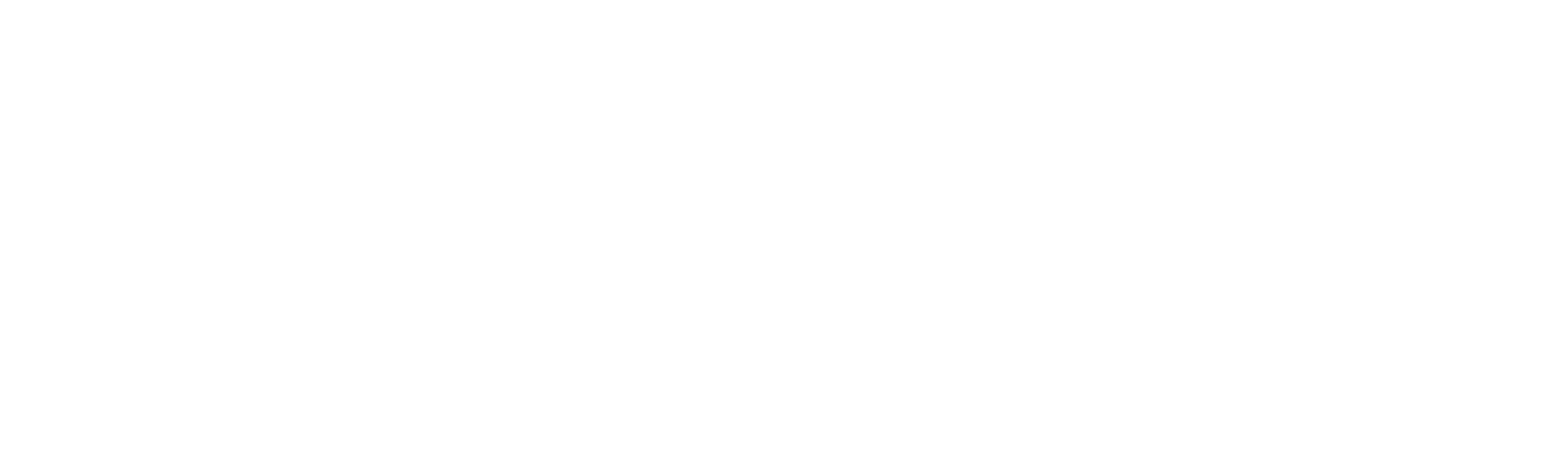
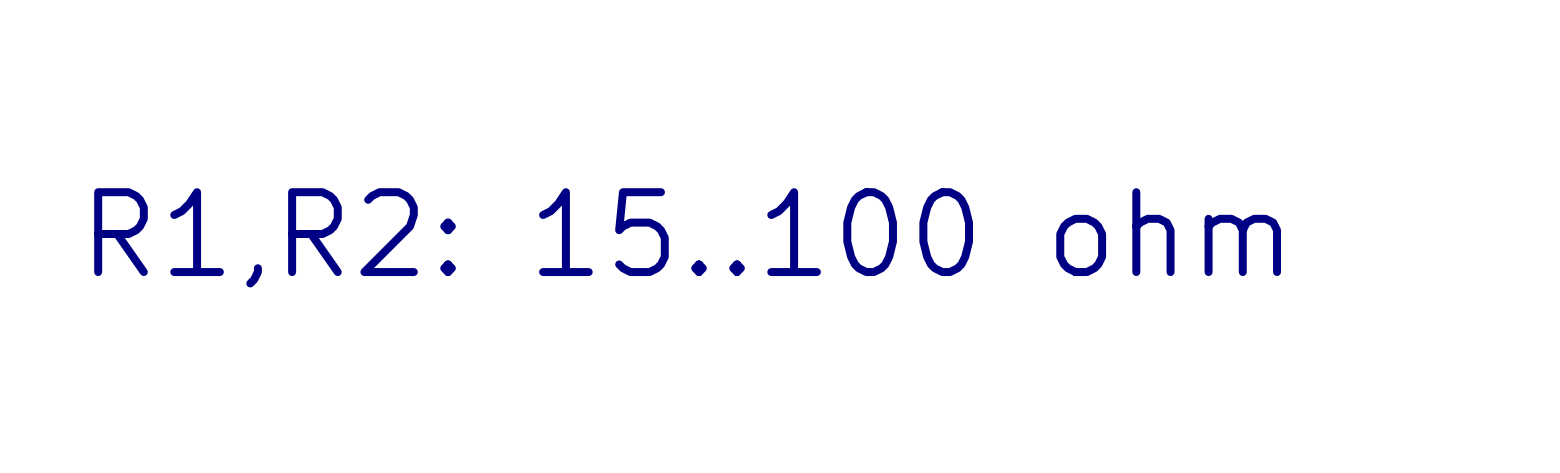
text: none -> R1,R2: 15..100 ohm (687, 237)

